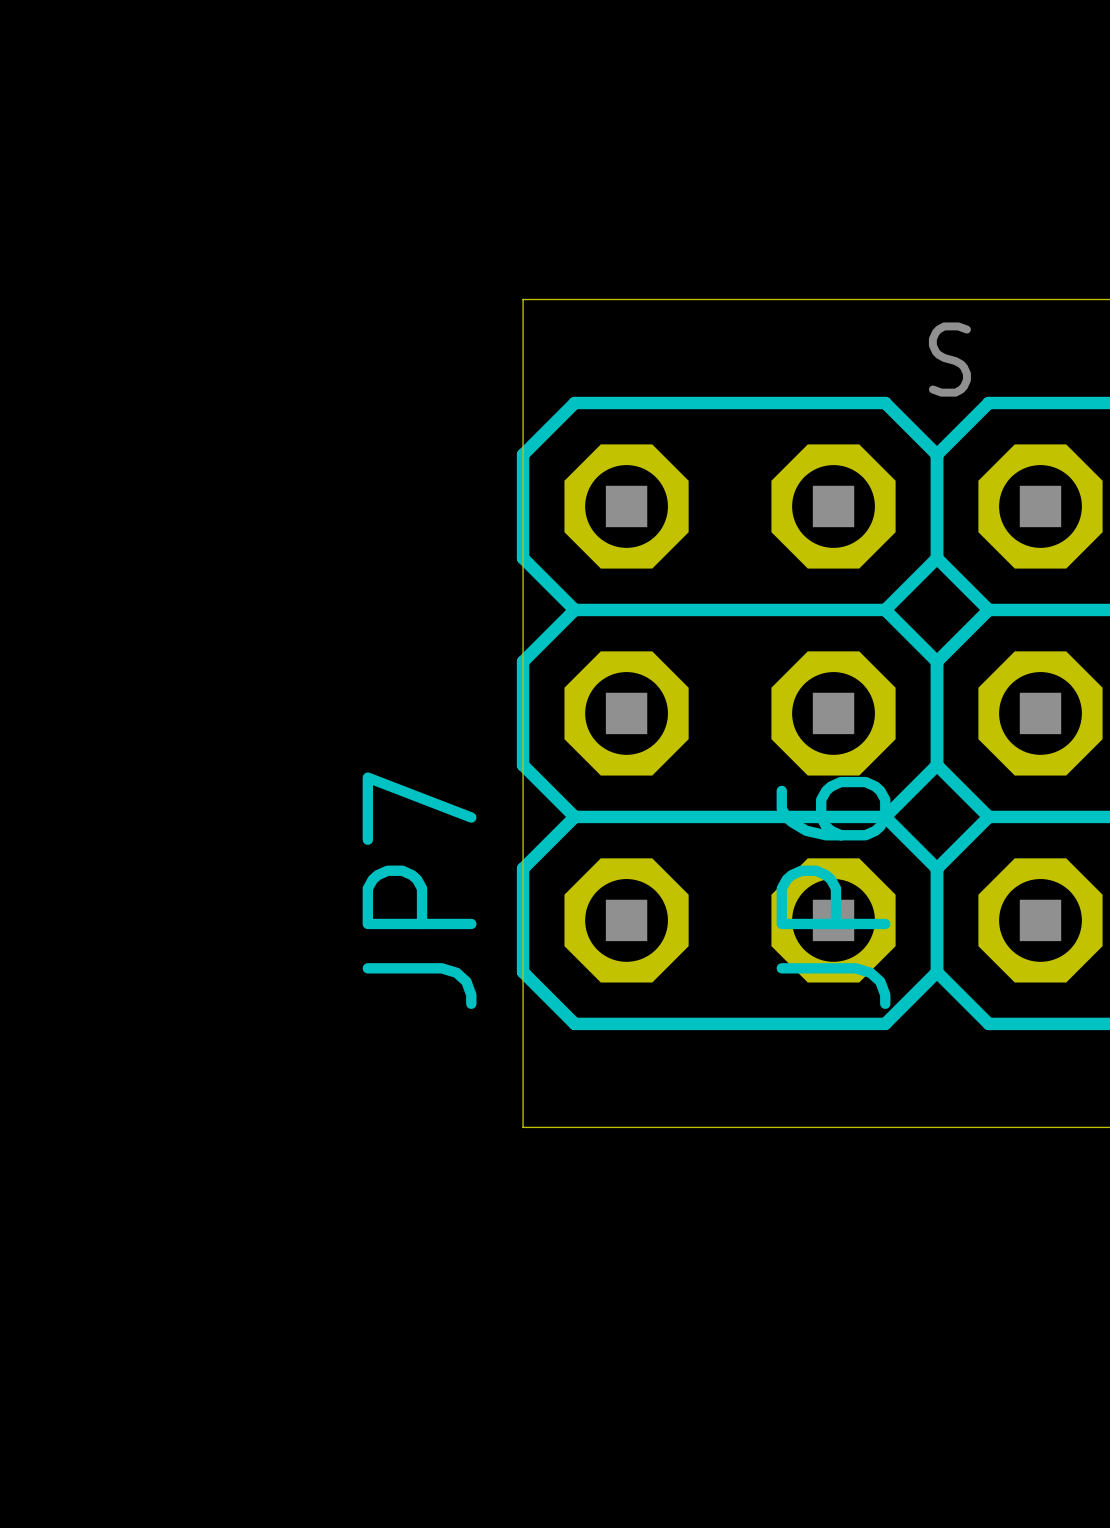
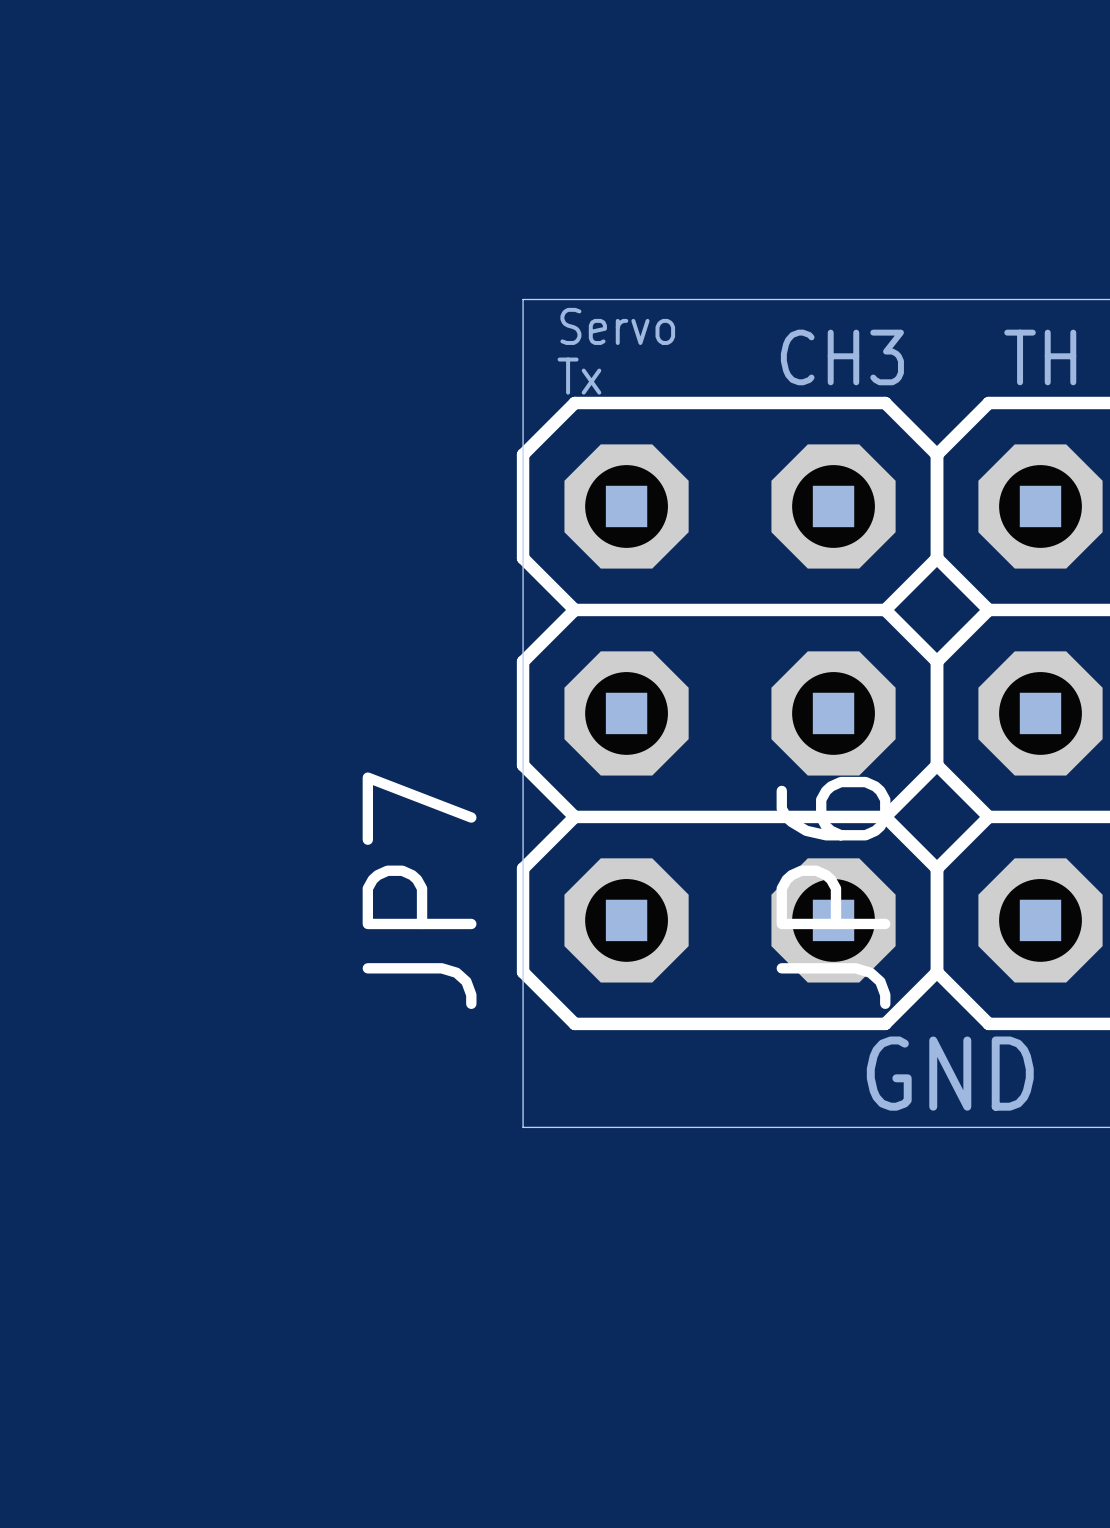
text: none -> Servo (617, 326)
text: none -> CH3 (842, 357)
text: none -> TH (1040, 357)
text: S (949, 359) -> none
text: none -> Tx (579, 376)
text: none -> GND (950, 1073)

